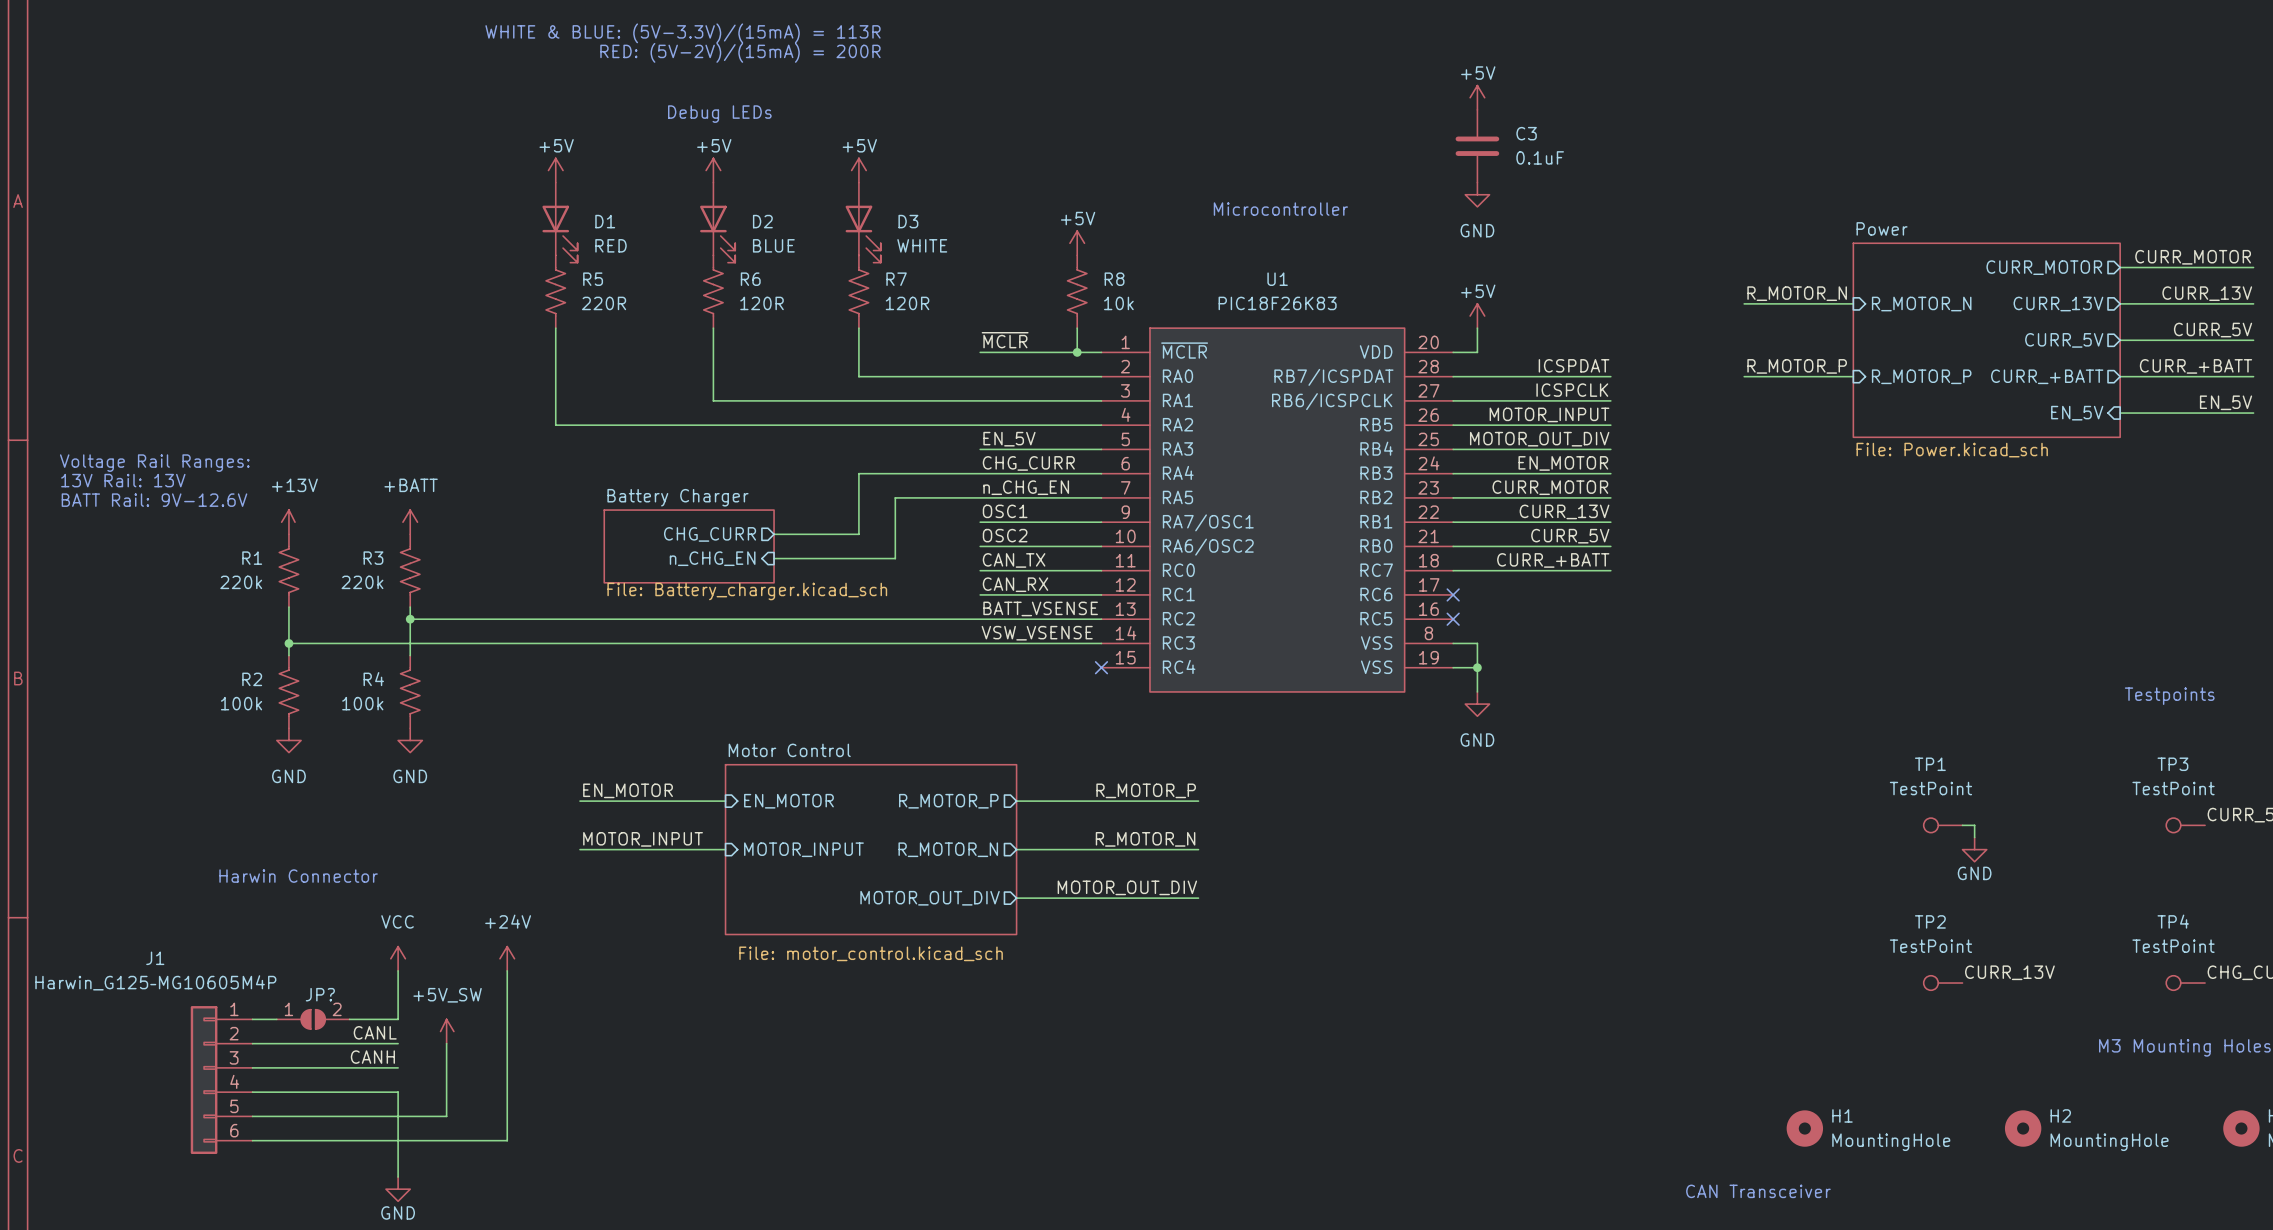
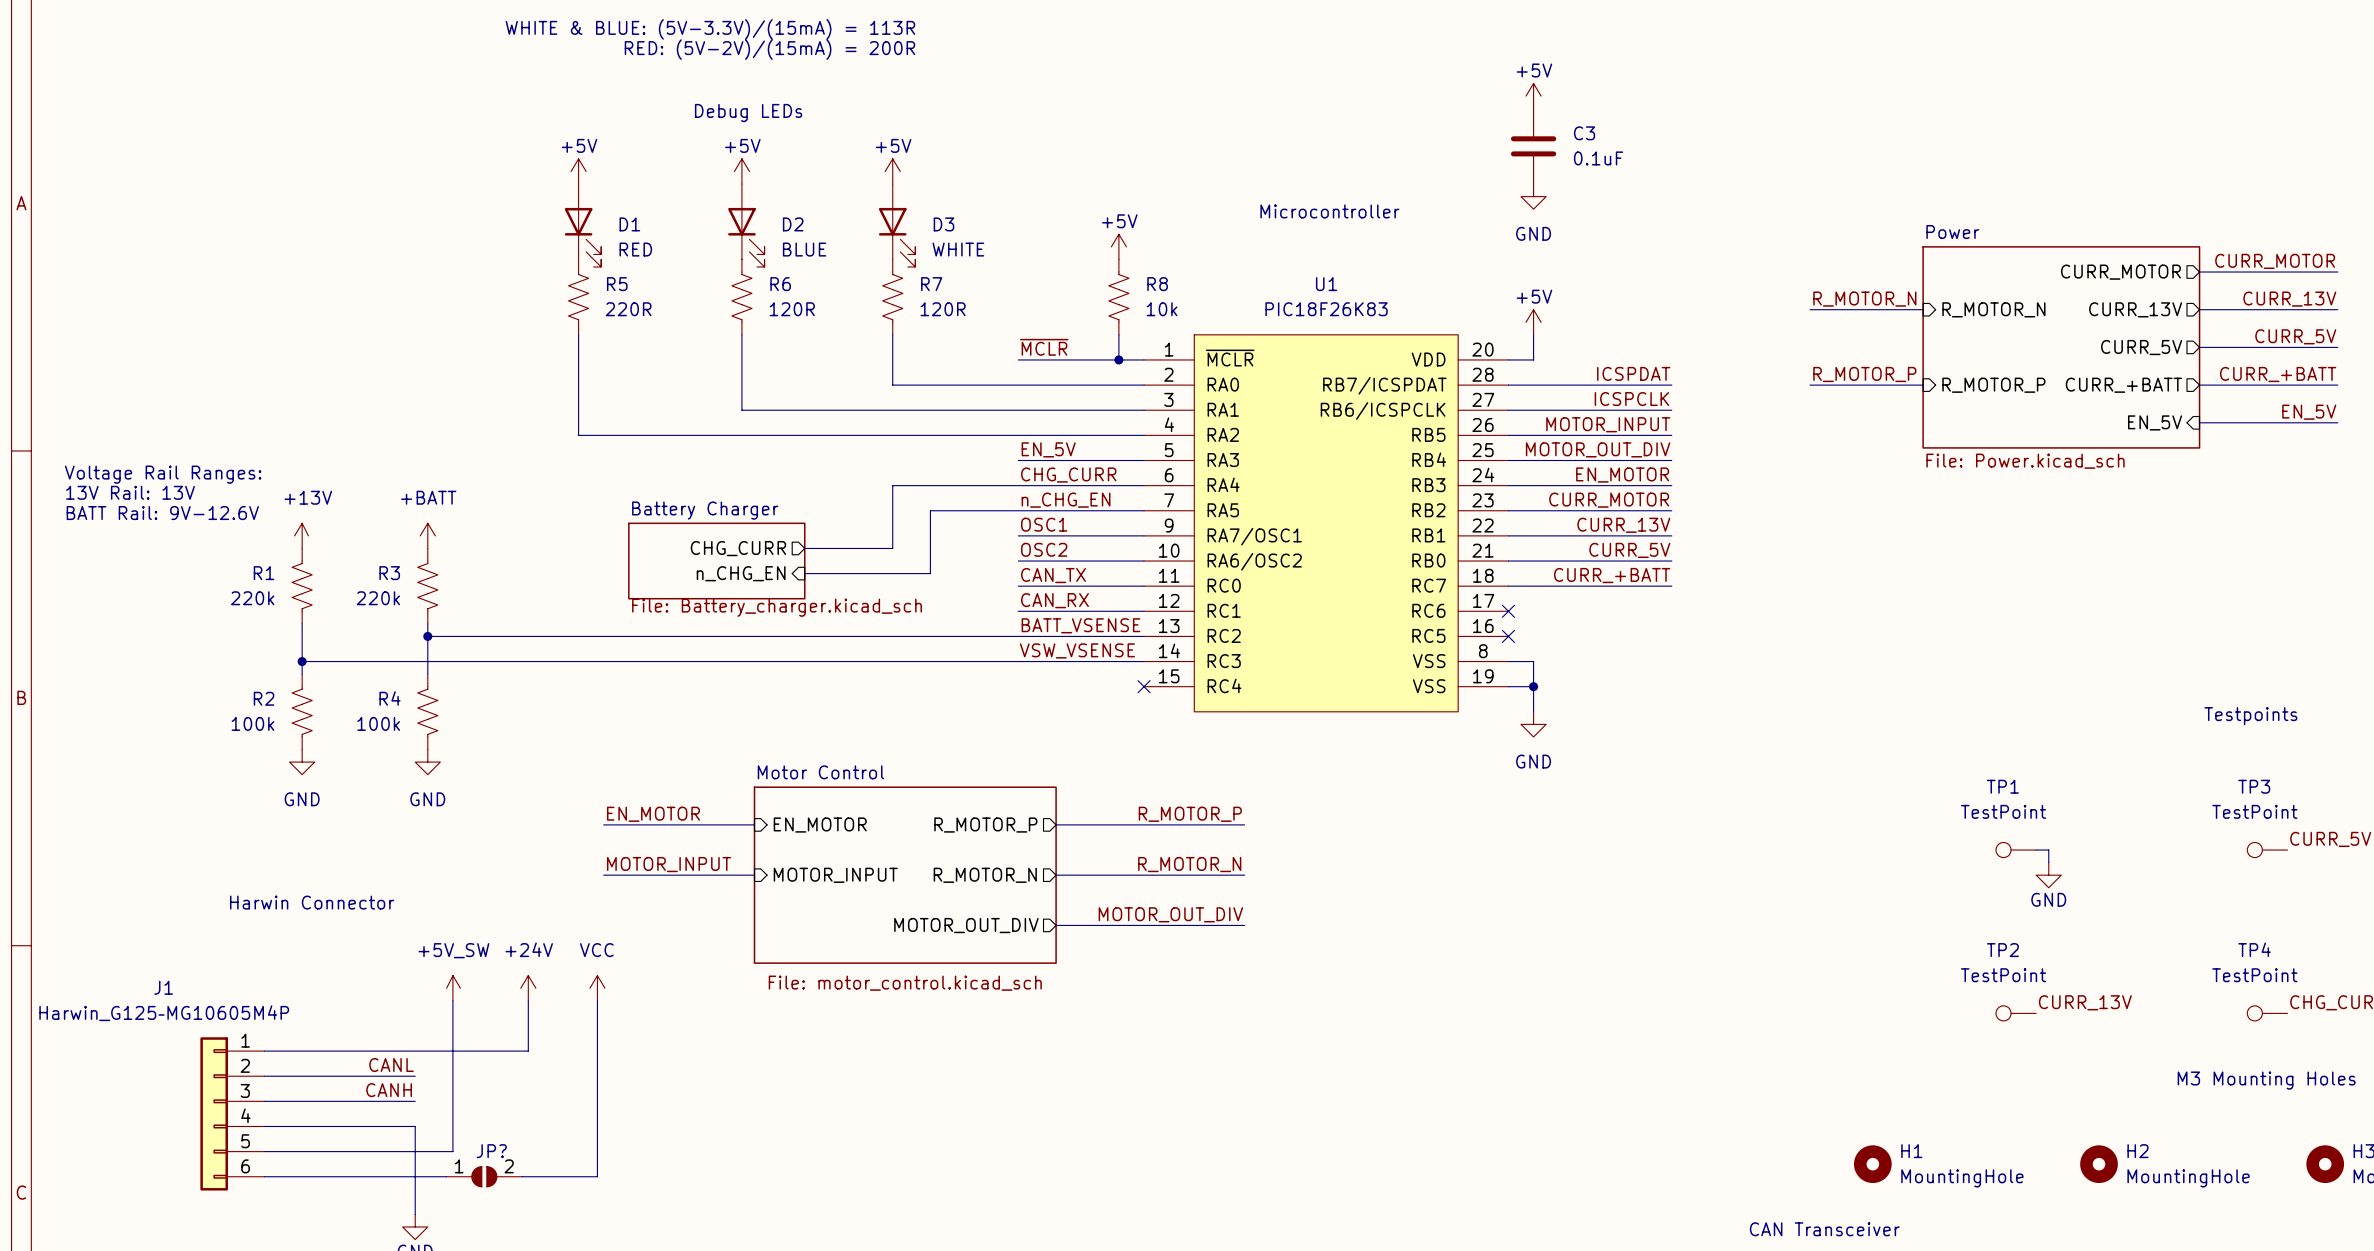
power symbol position: VCC (398, 958) -> VCC (597, 988)
wire: (398, 970) (398, 1019) -> (528, 1051) (415, 1051)
JP? position: (313, 1019) -> (484, 1176)
wire: (507, 1019) (507, 1140) -> (597, 1000) (597, 1176) (528, 1176)
power symbol position: +5V_SW (447, 1031) -> +5V_SW (453, 988)
wire: (446, 1043) (446, 1116) (434, 1116) -> (452, 1000) (452, 1151)

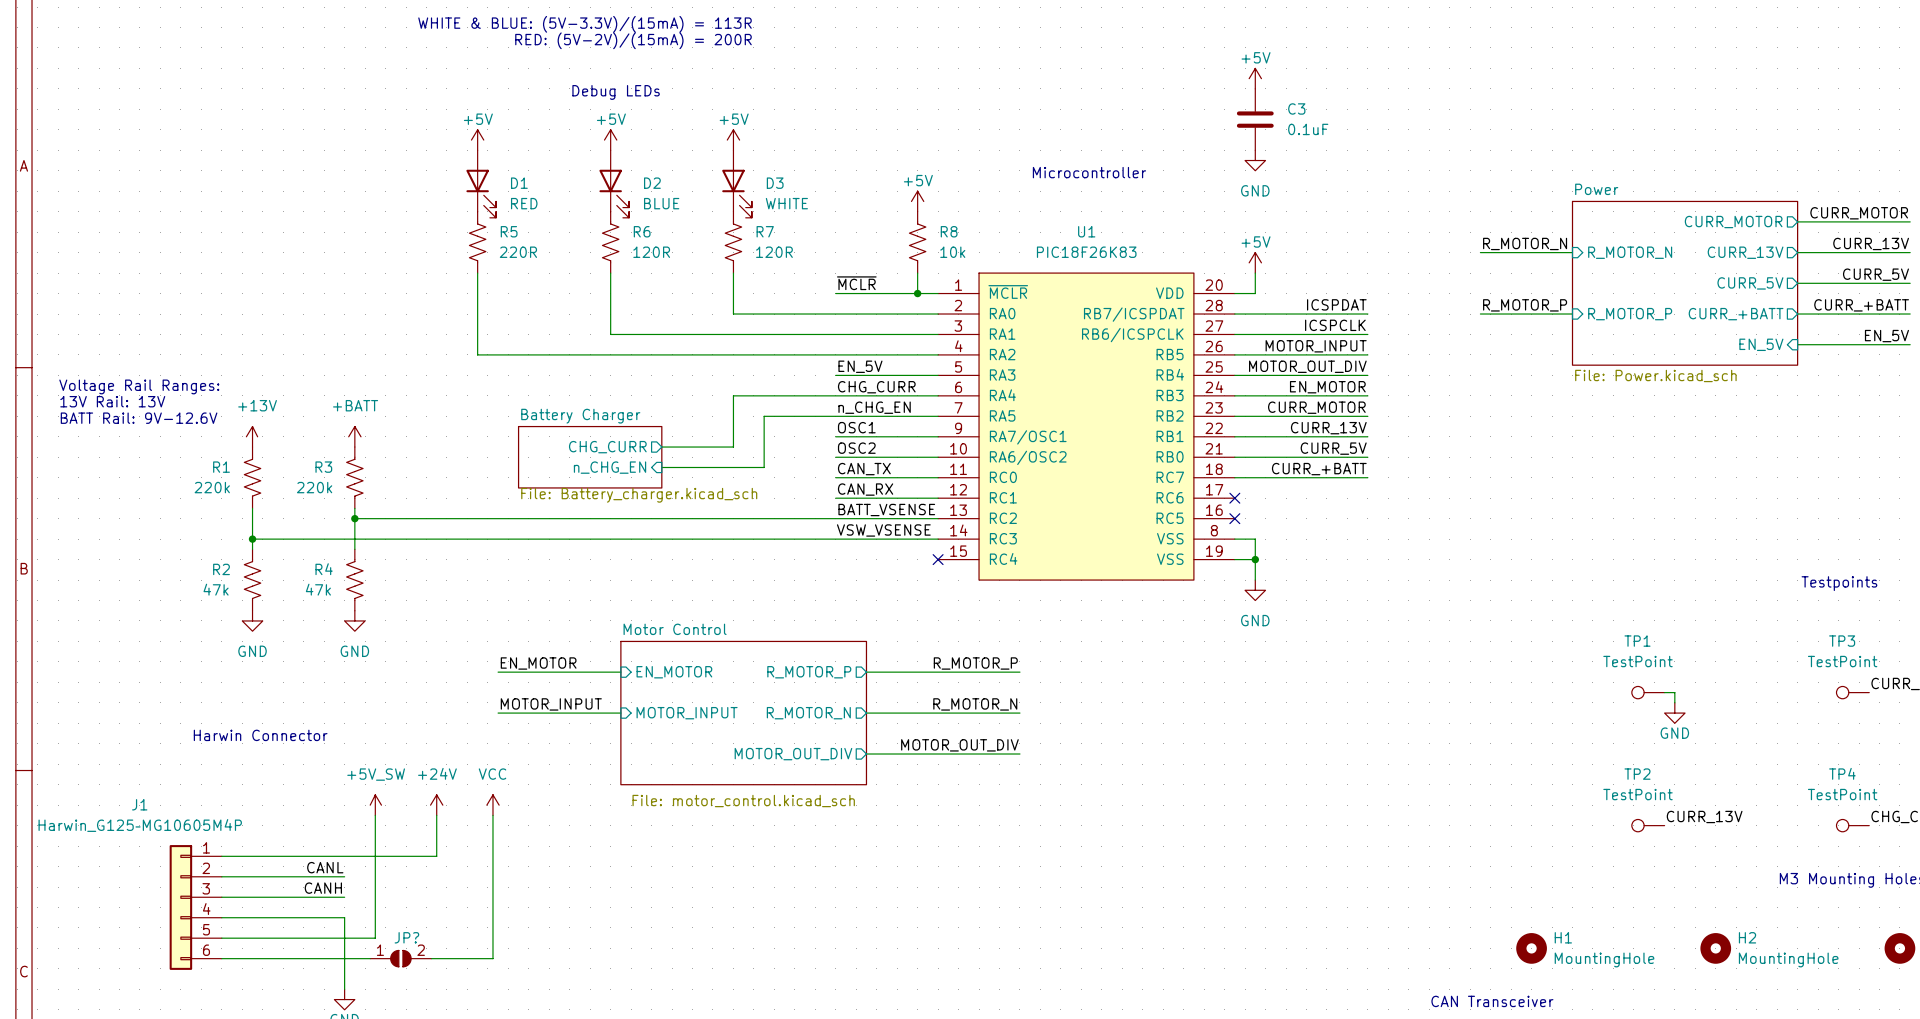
R2 value: 100k (252, 723) -> 47k (216, 589)
R4 value: 100k (378, 723) -> 47k (318, 589)

